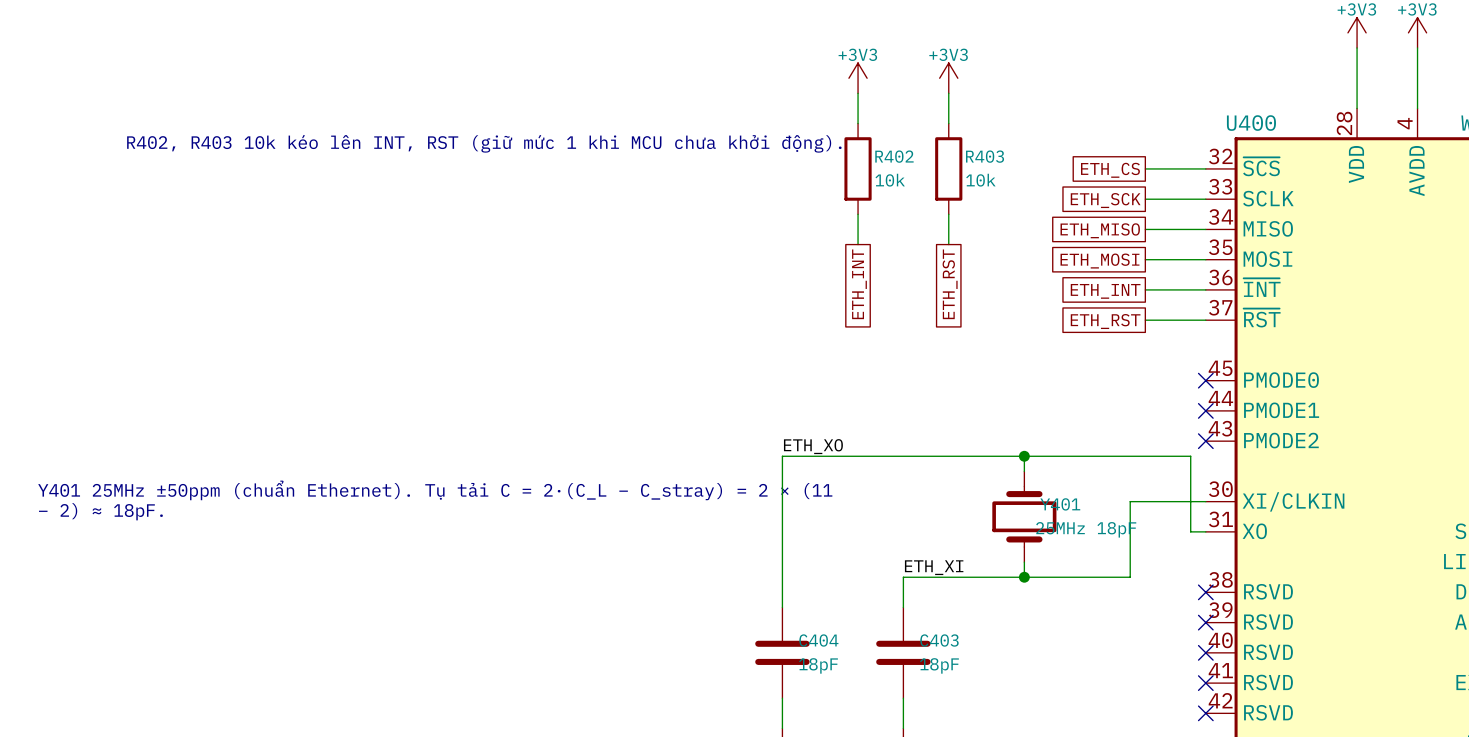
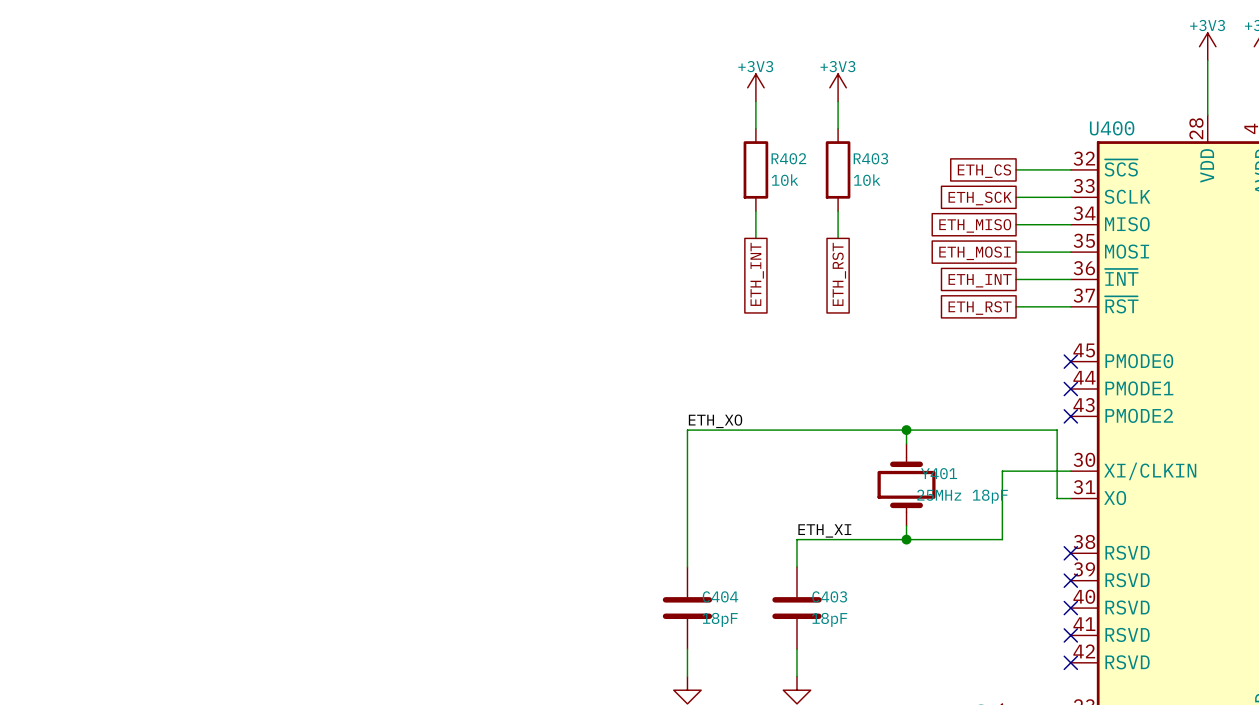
text: R402, R403 10k kéo lên INT, RST (giữ mức 1 khi MCU chưa khởi động). (484, 143) -> none
text: Y401 25MHz ±50ppm (chuẩn Ethernet). Tụ tải C = 2·(C_L − C_stray) = 2 × (11 (435, 490) -> none
text: − 2) ≈ 18pF. (100, 511) -> none

